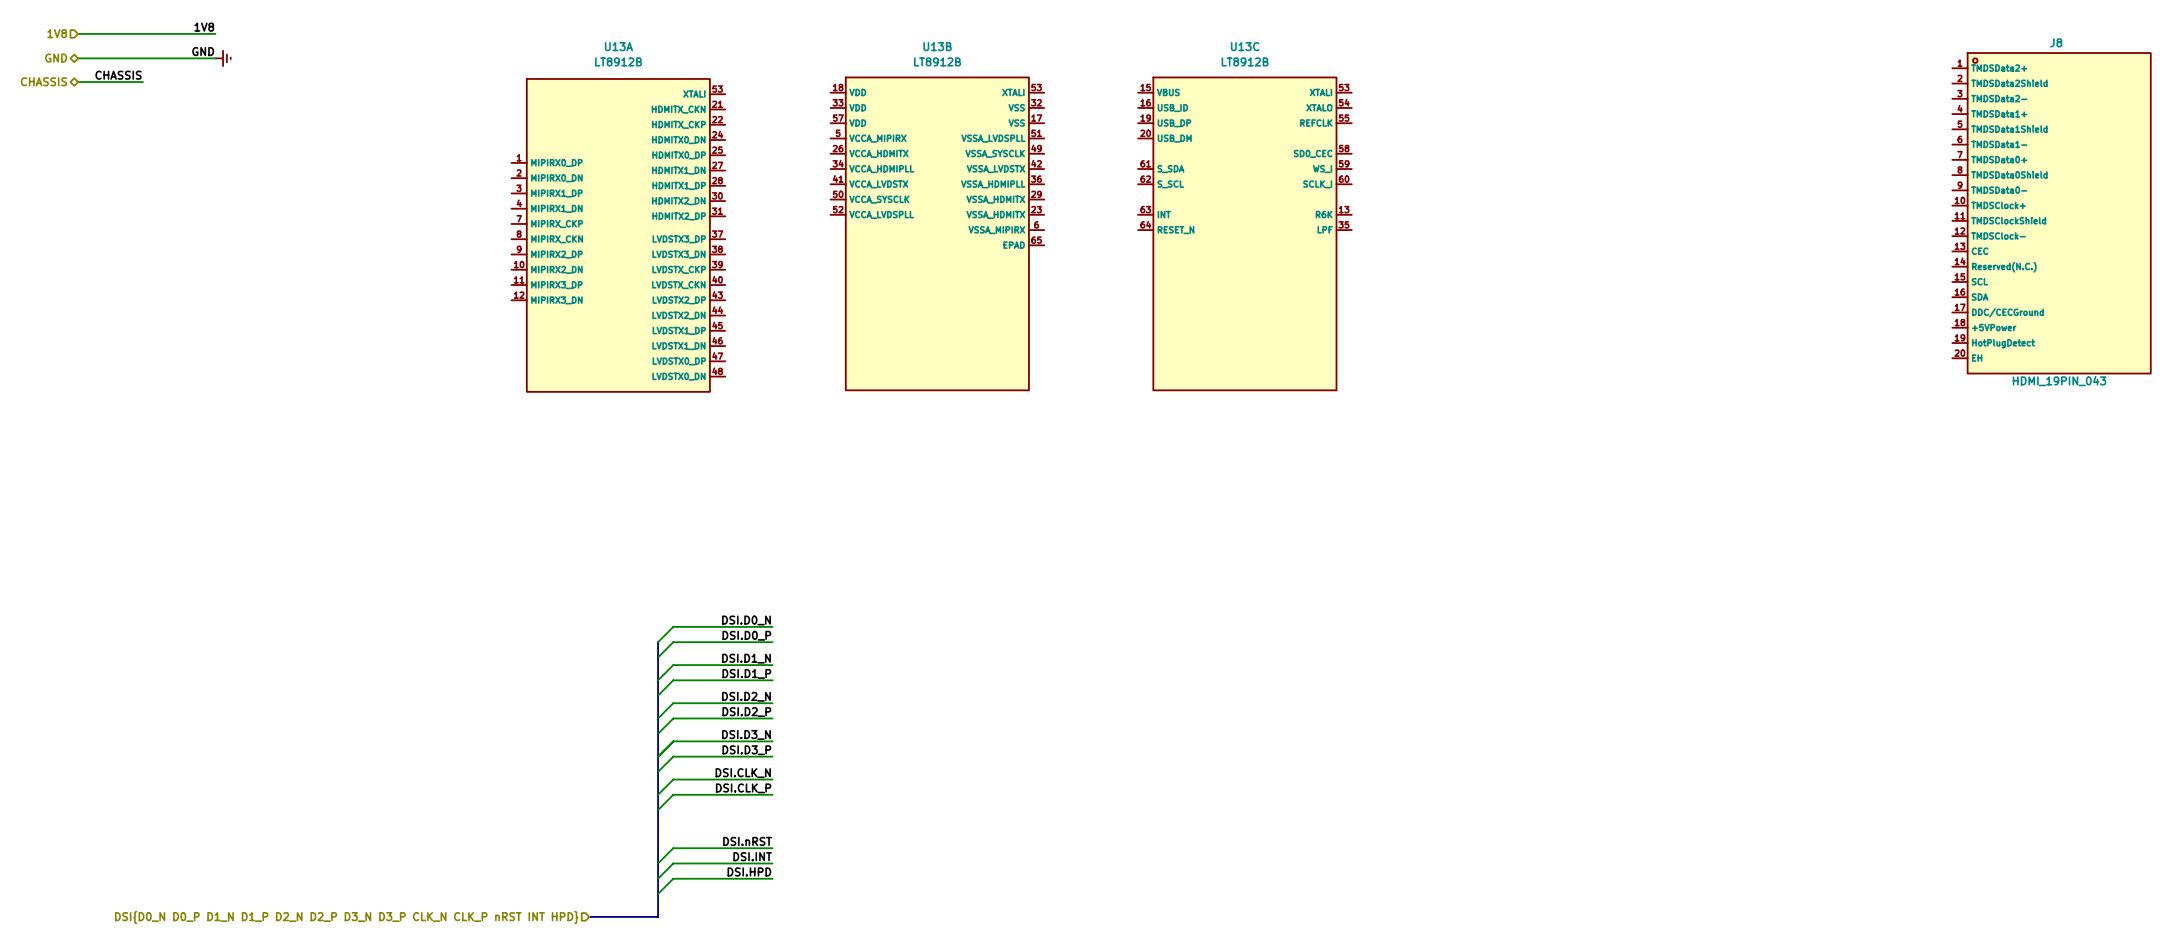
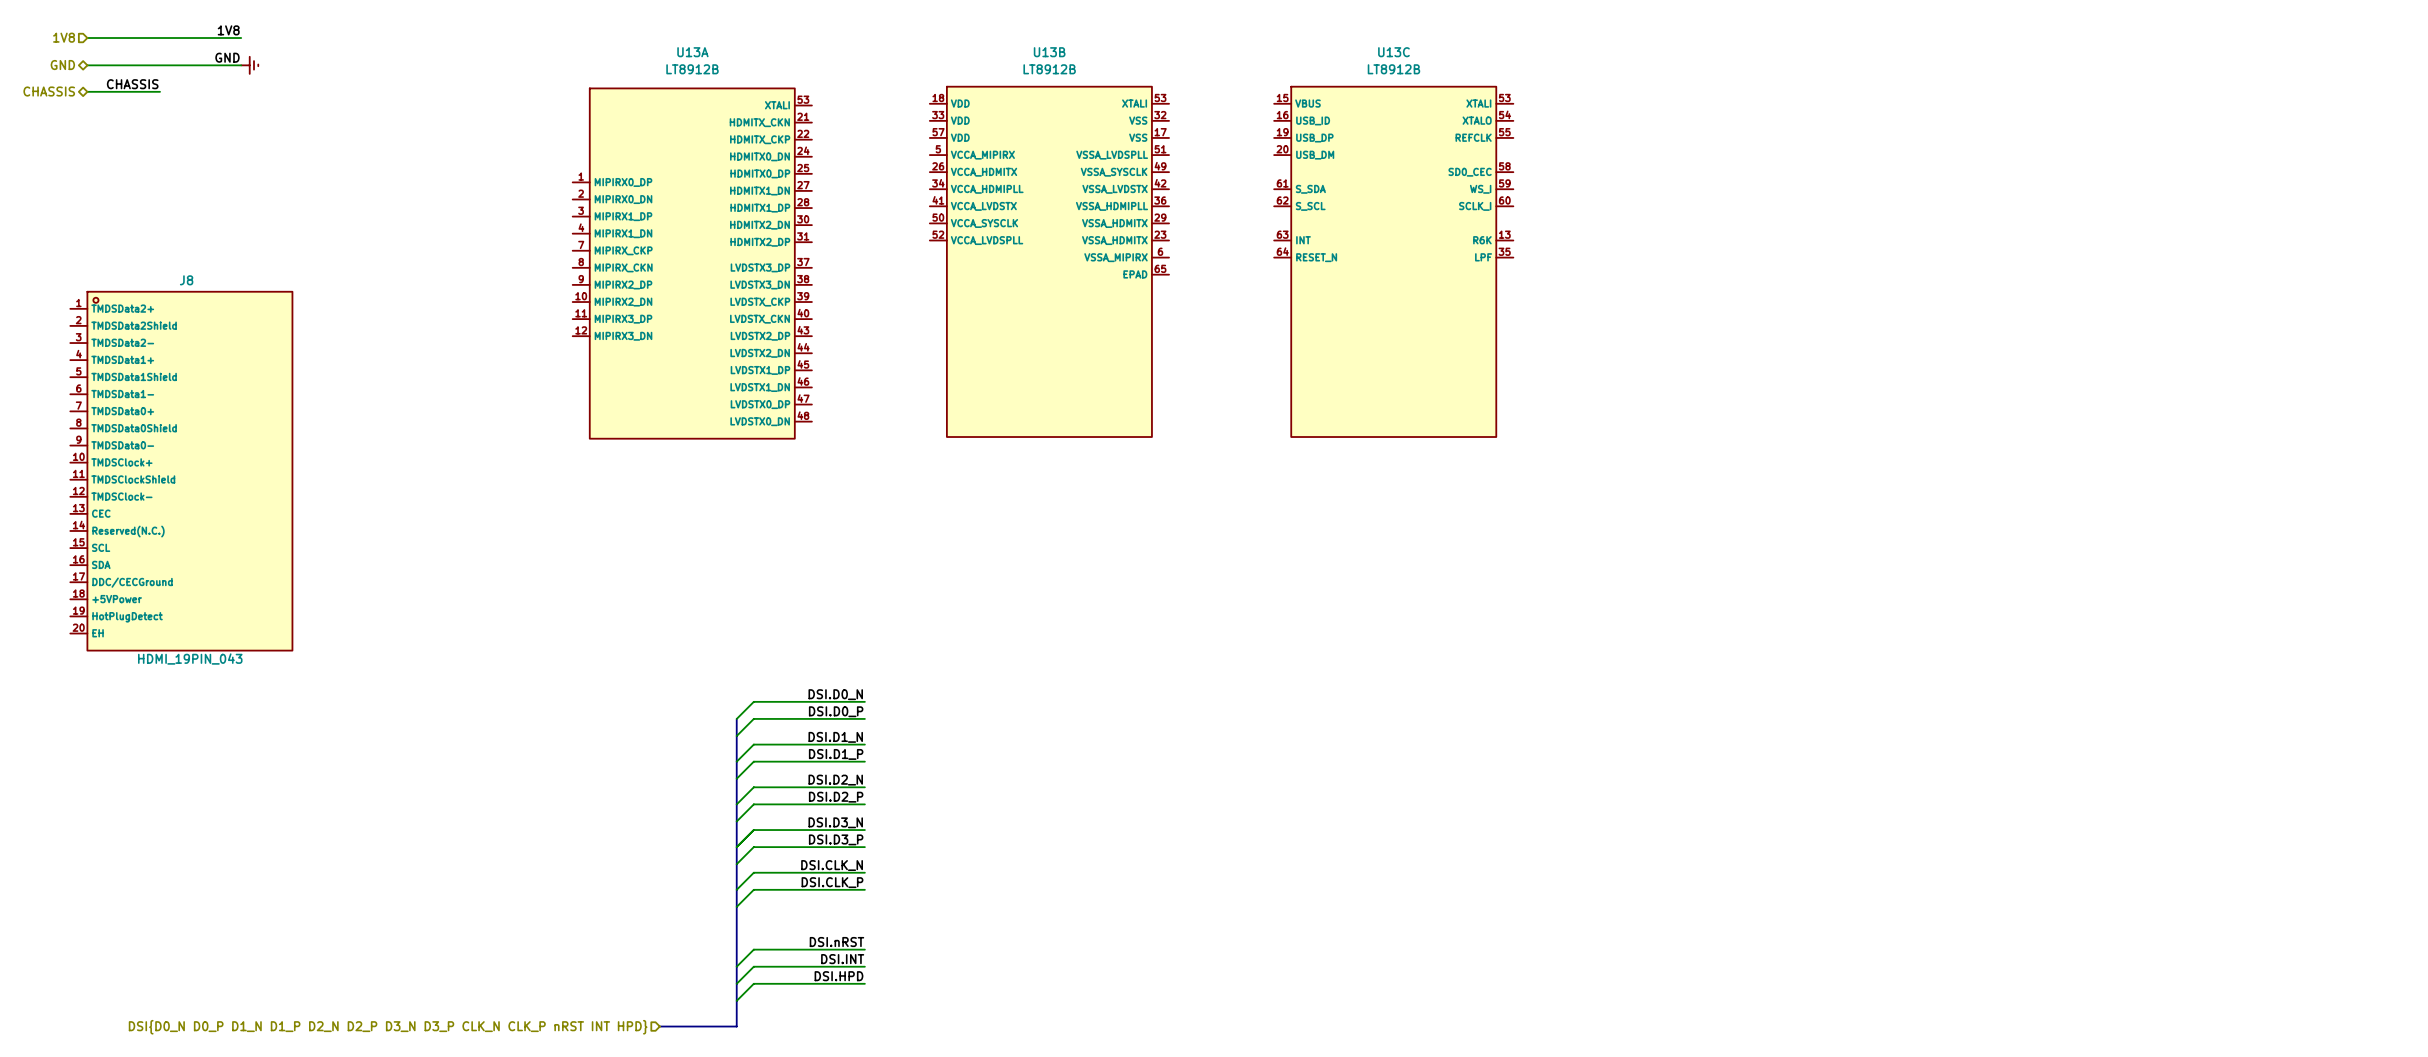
J8 position: (2051, 213) -> (181, 471)

